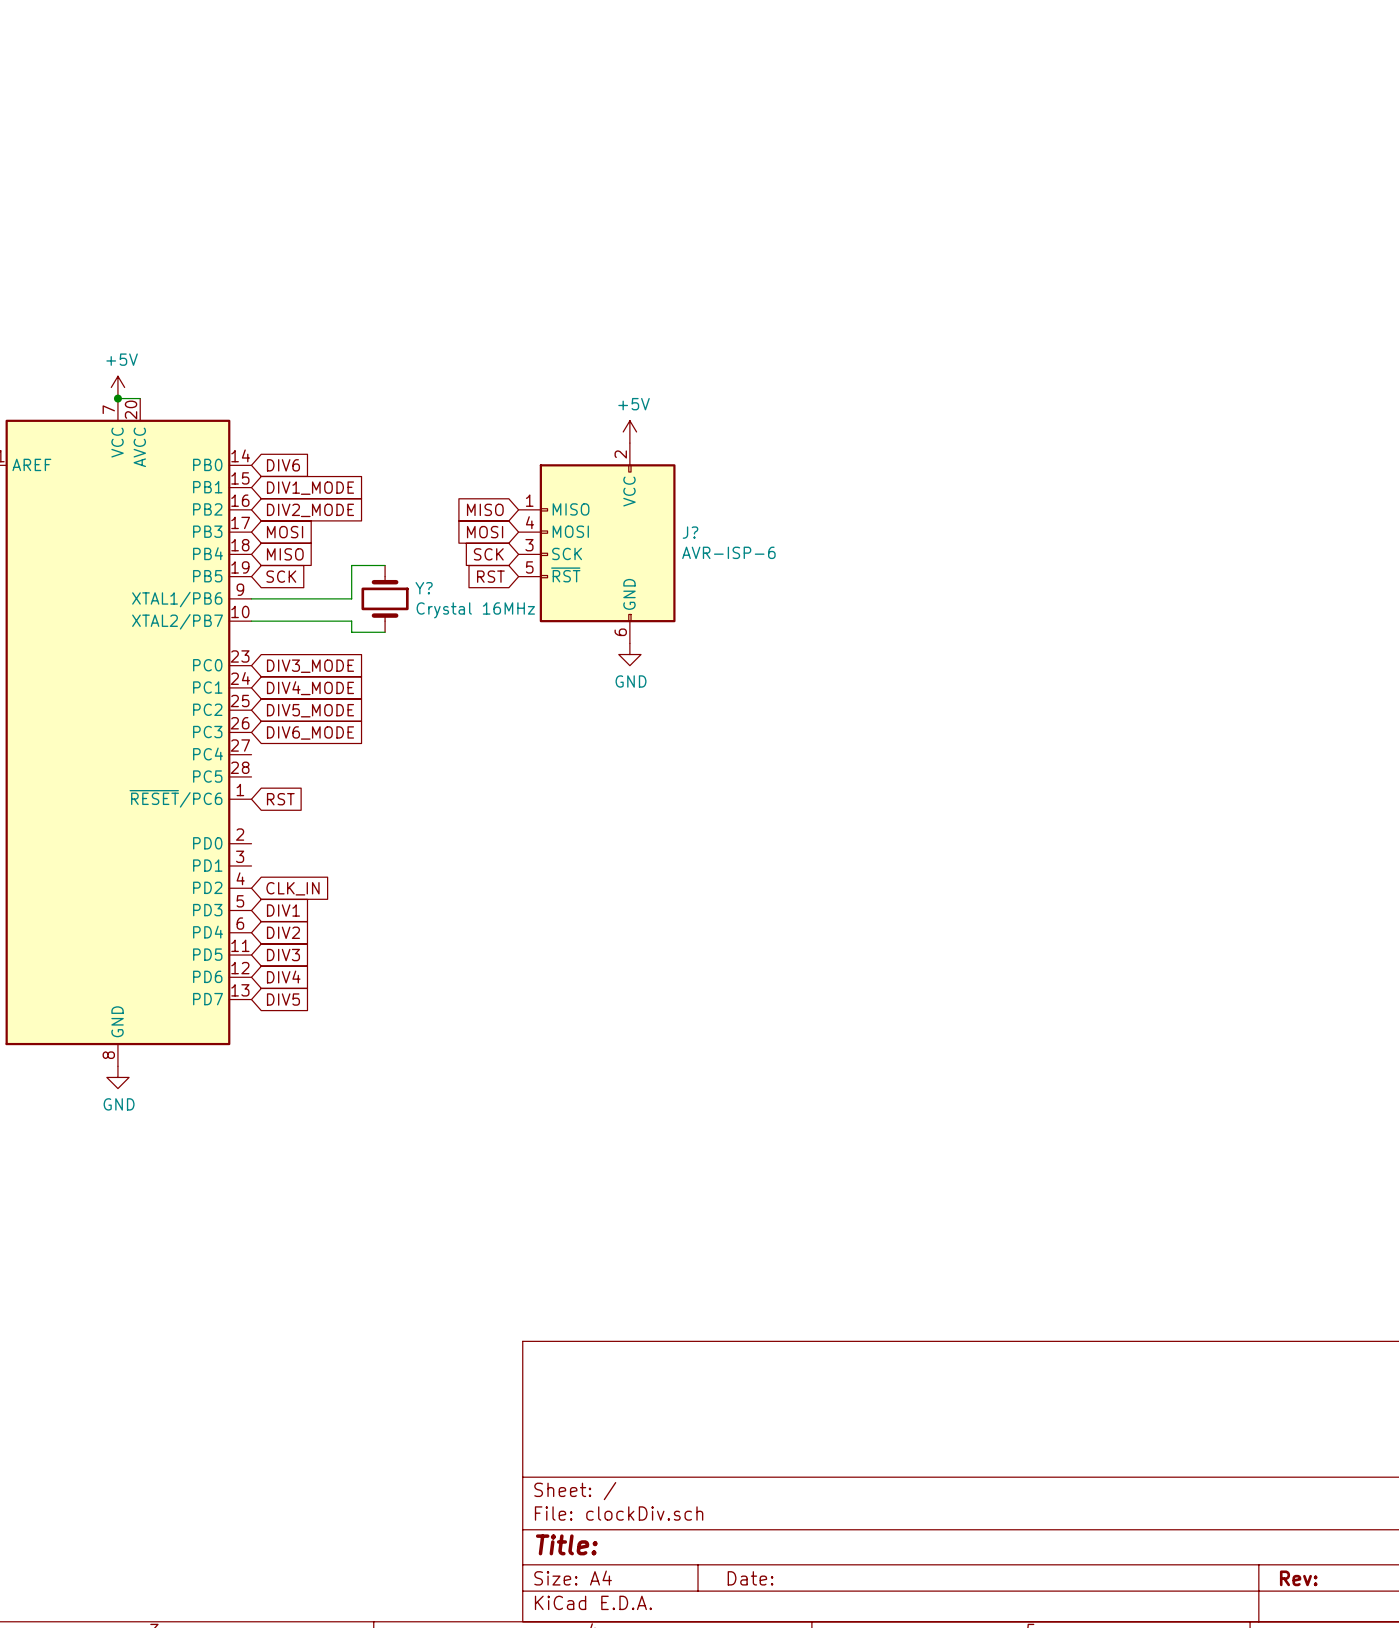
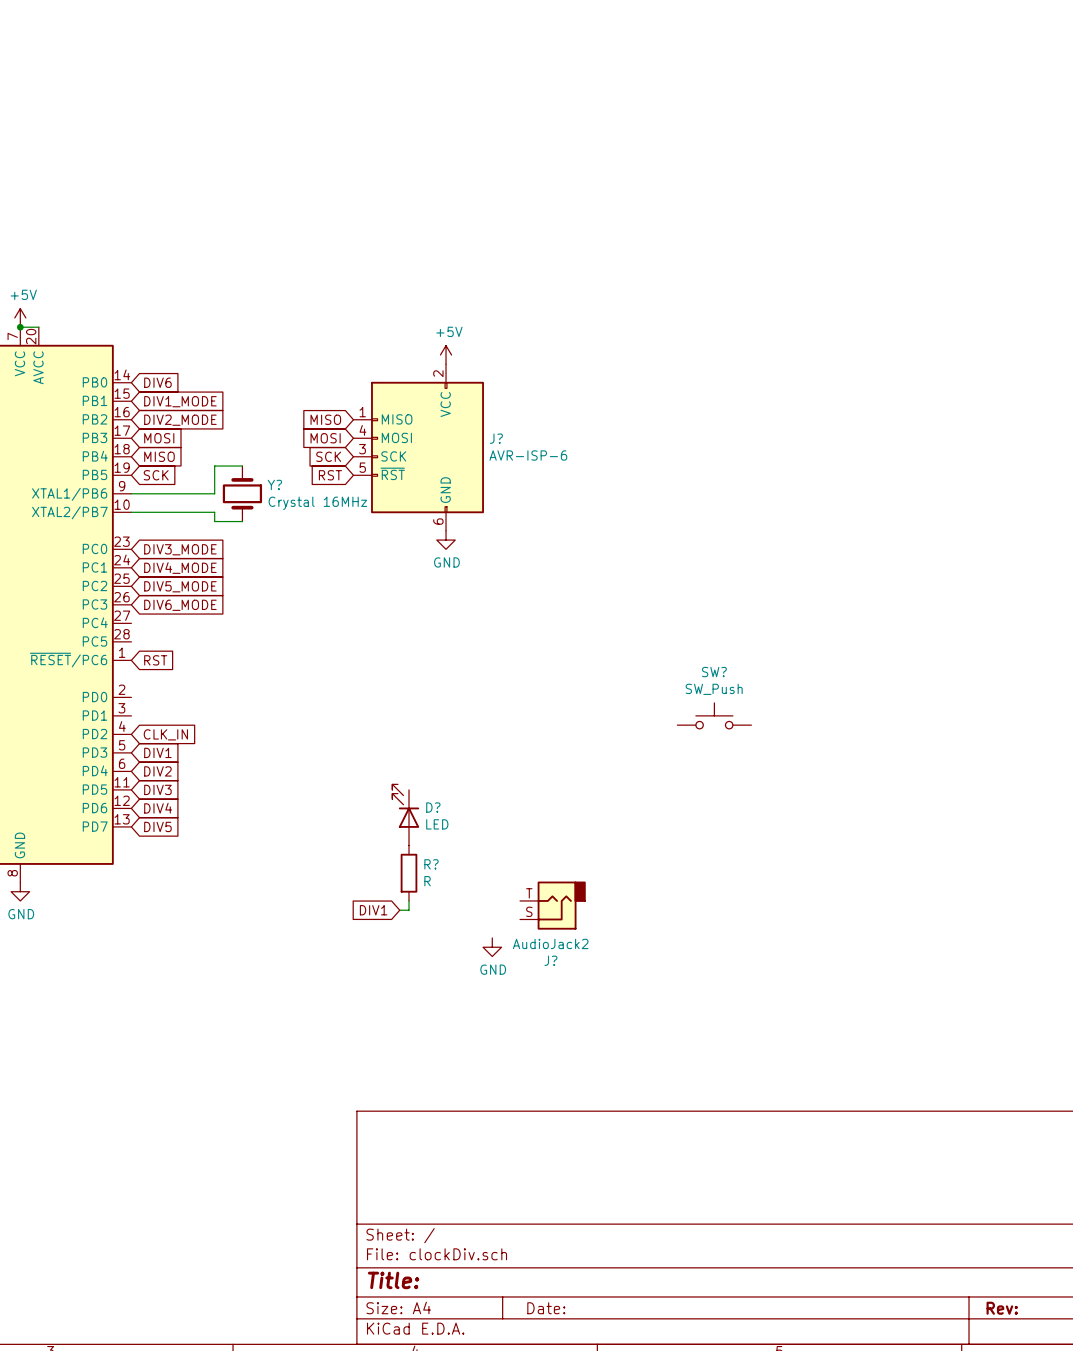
SW?: none -> SW_Push (714, 715)
D?: none -> LED (405, 814)
R?: none -> R (409, 873)
wire: none -> (409, 900) (409, 910) (399, 910)
J?: none -> AudioJack2 (552, 905)
global label: none -> DIV1 (373, 910)
power symbol: none -> GND (492, 947)

